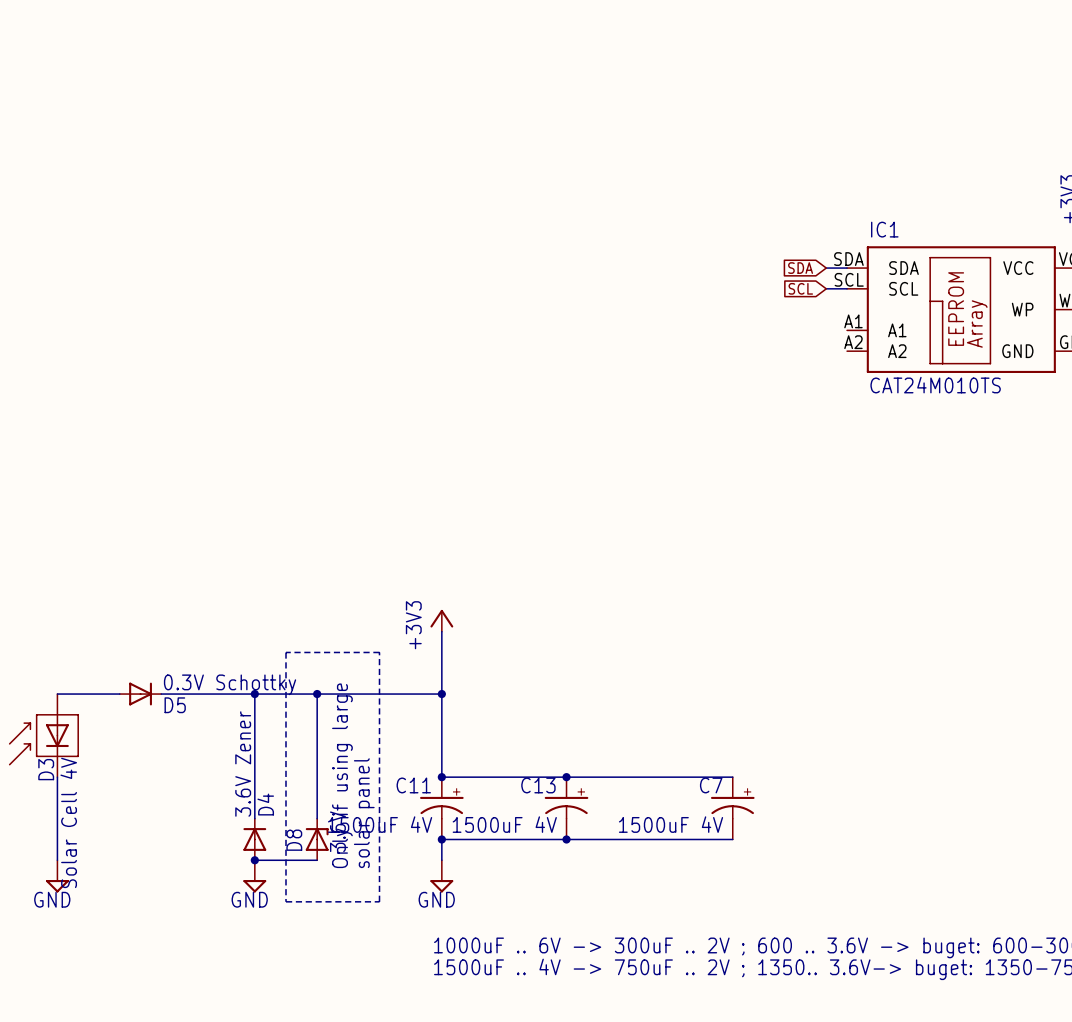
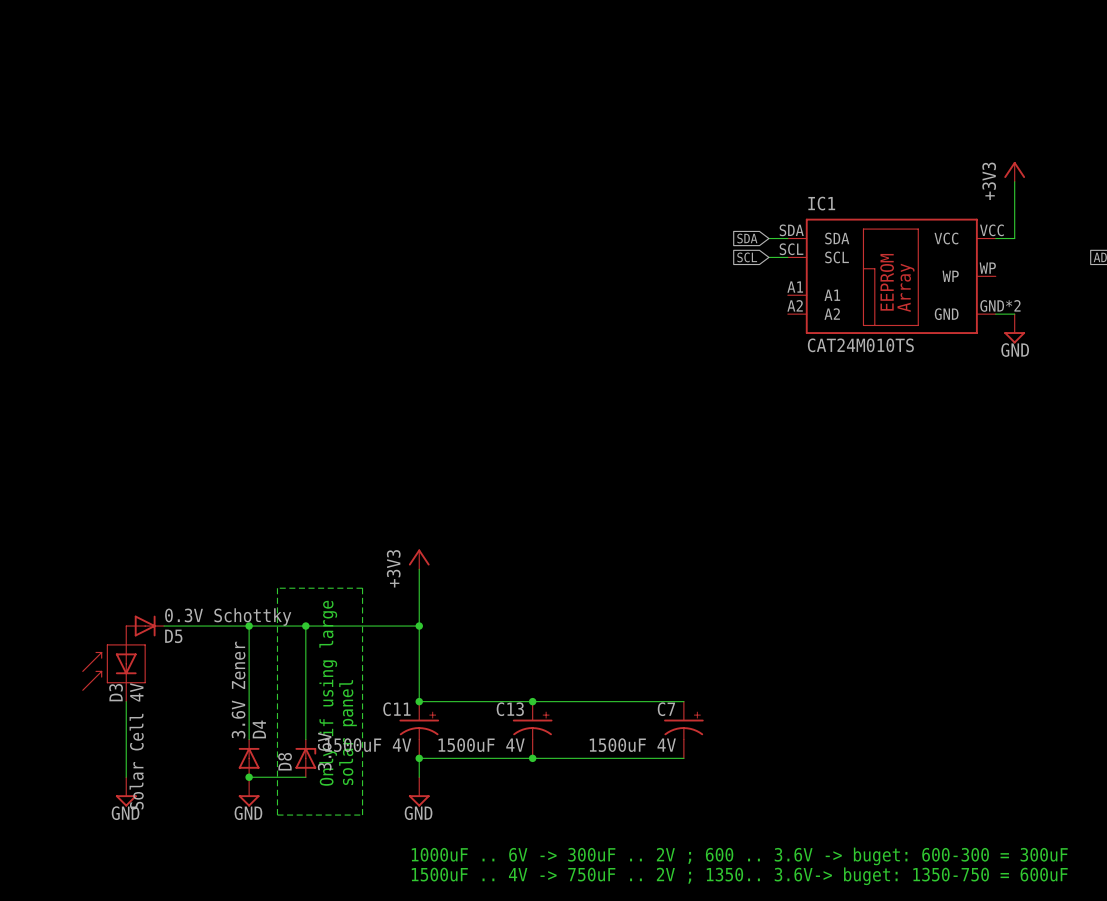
wire: (57, 694) (119, 694) -> none
D3 position: (43, 735) -> (113, 663)
wire: (57, 777) (57, 860) -> (126, 701) (126, 777)
power symbol position: GND (57, 876) -> GND (126, 791)

